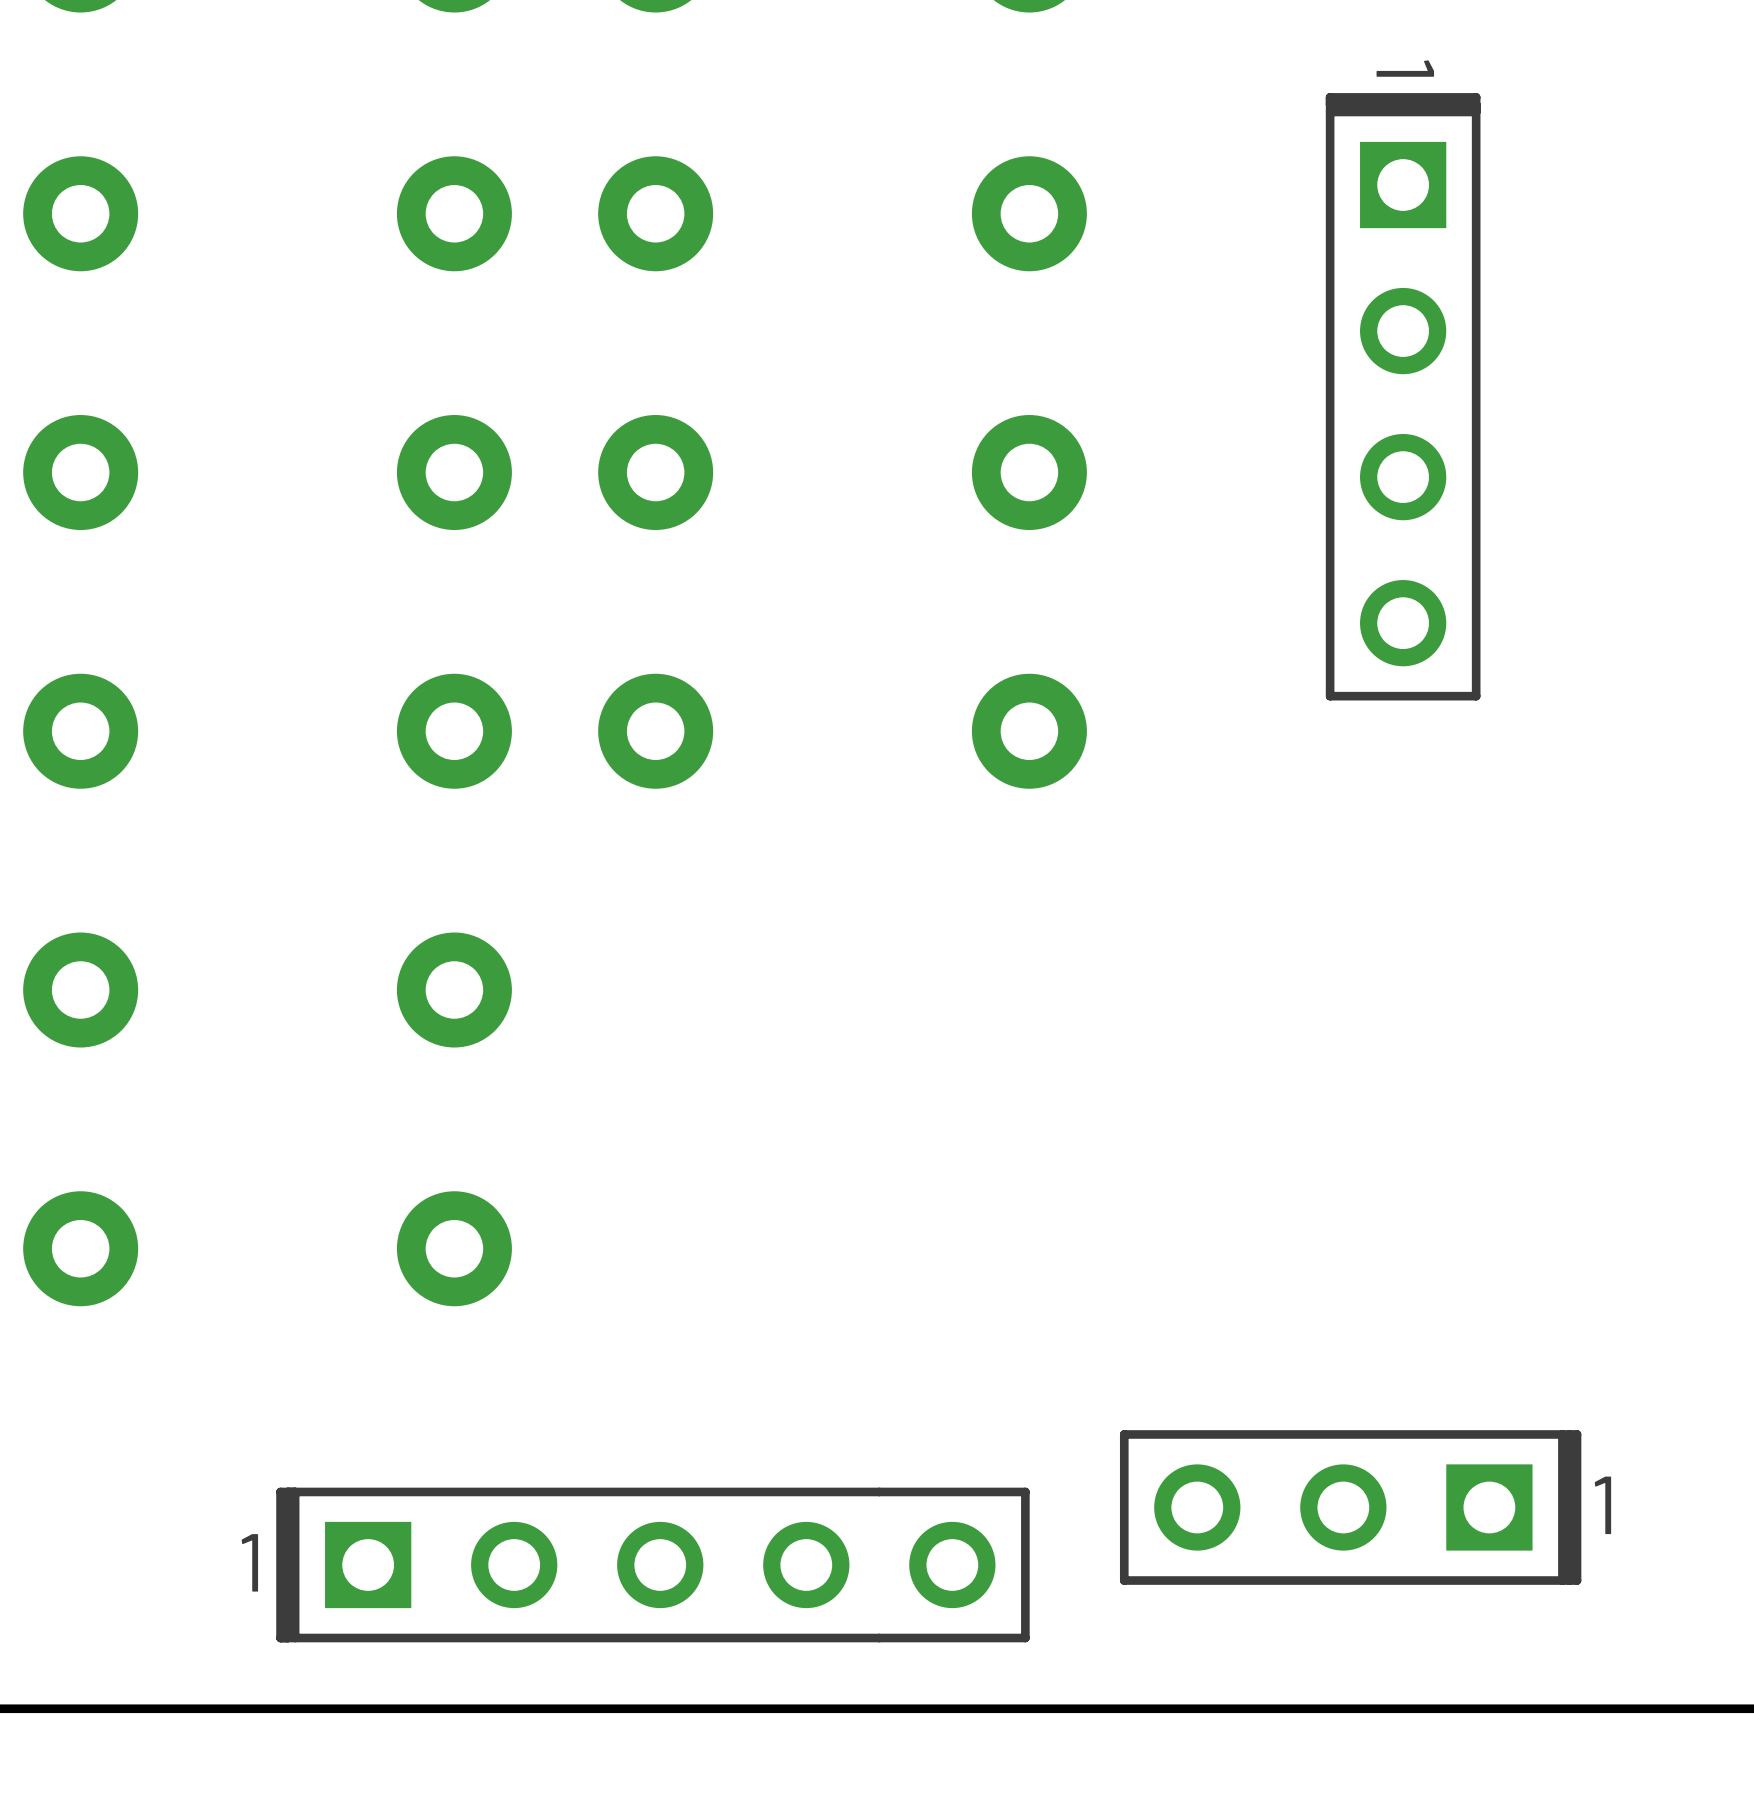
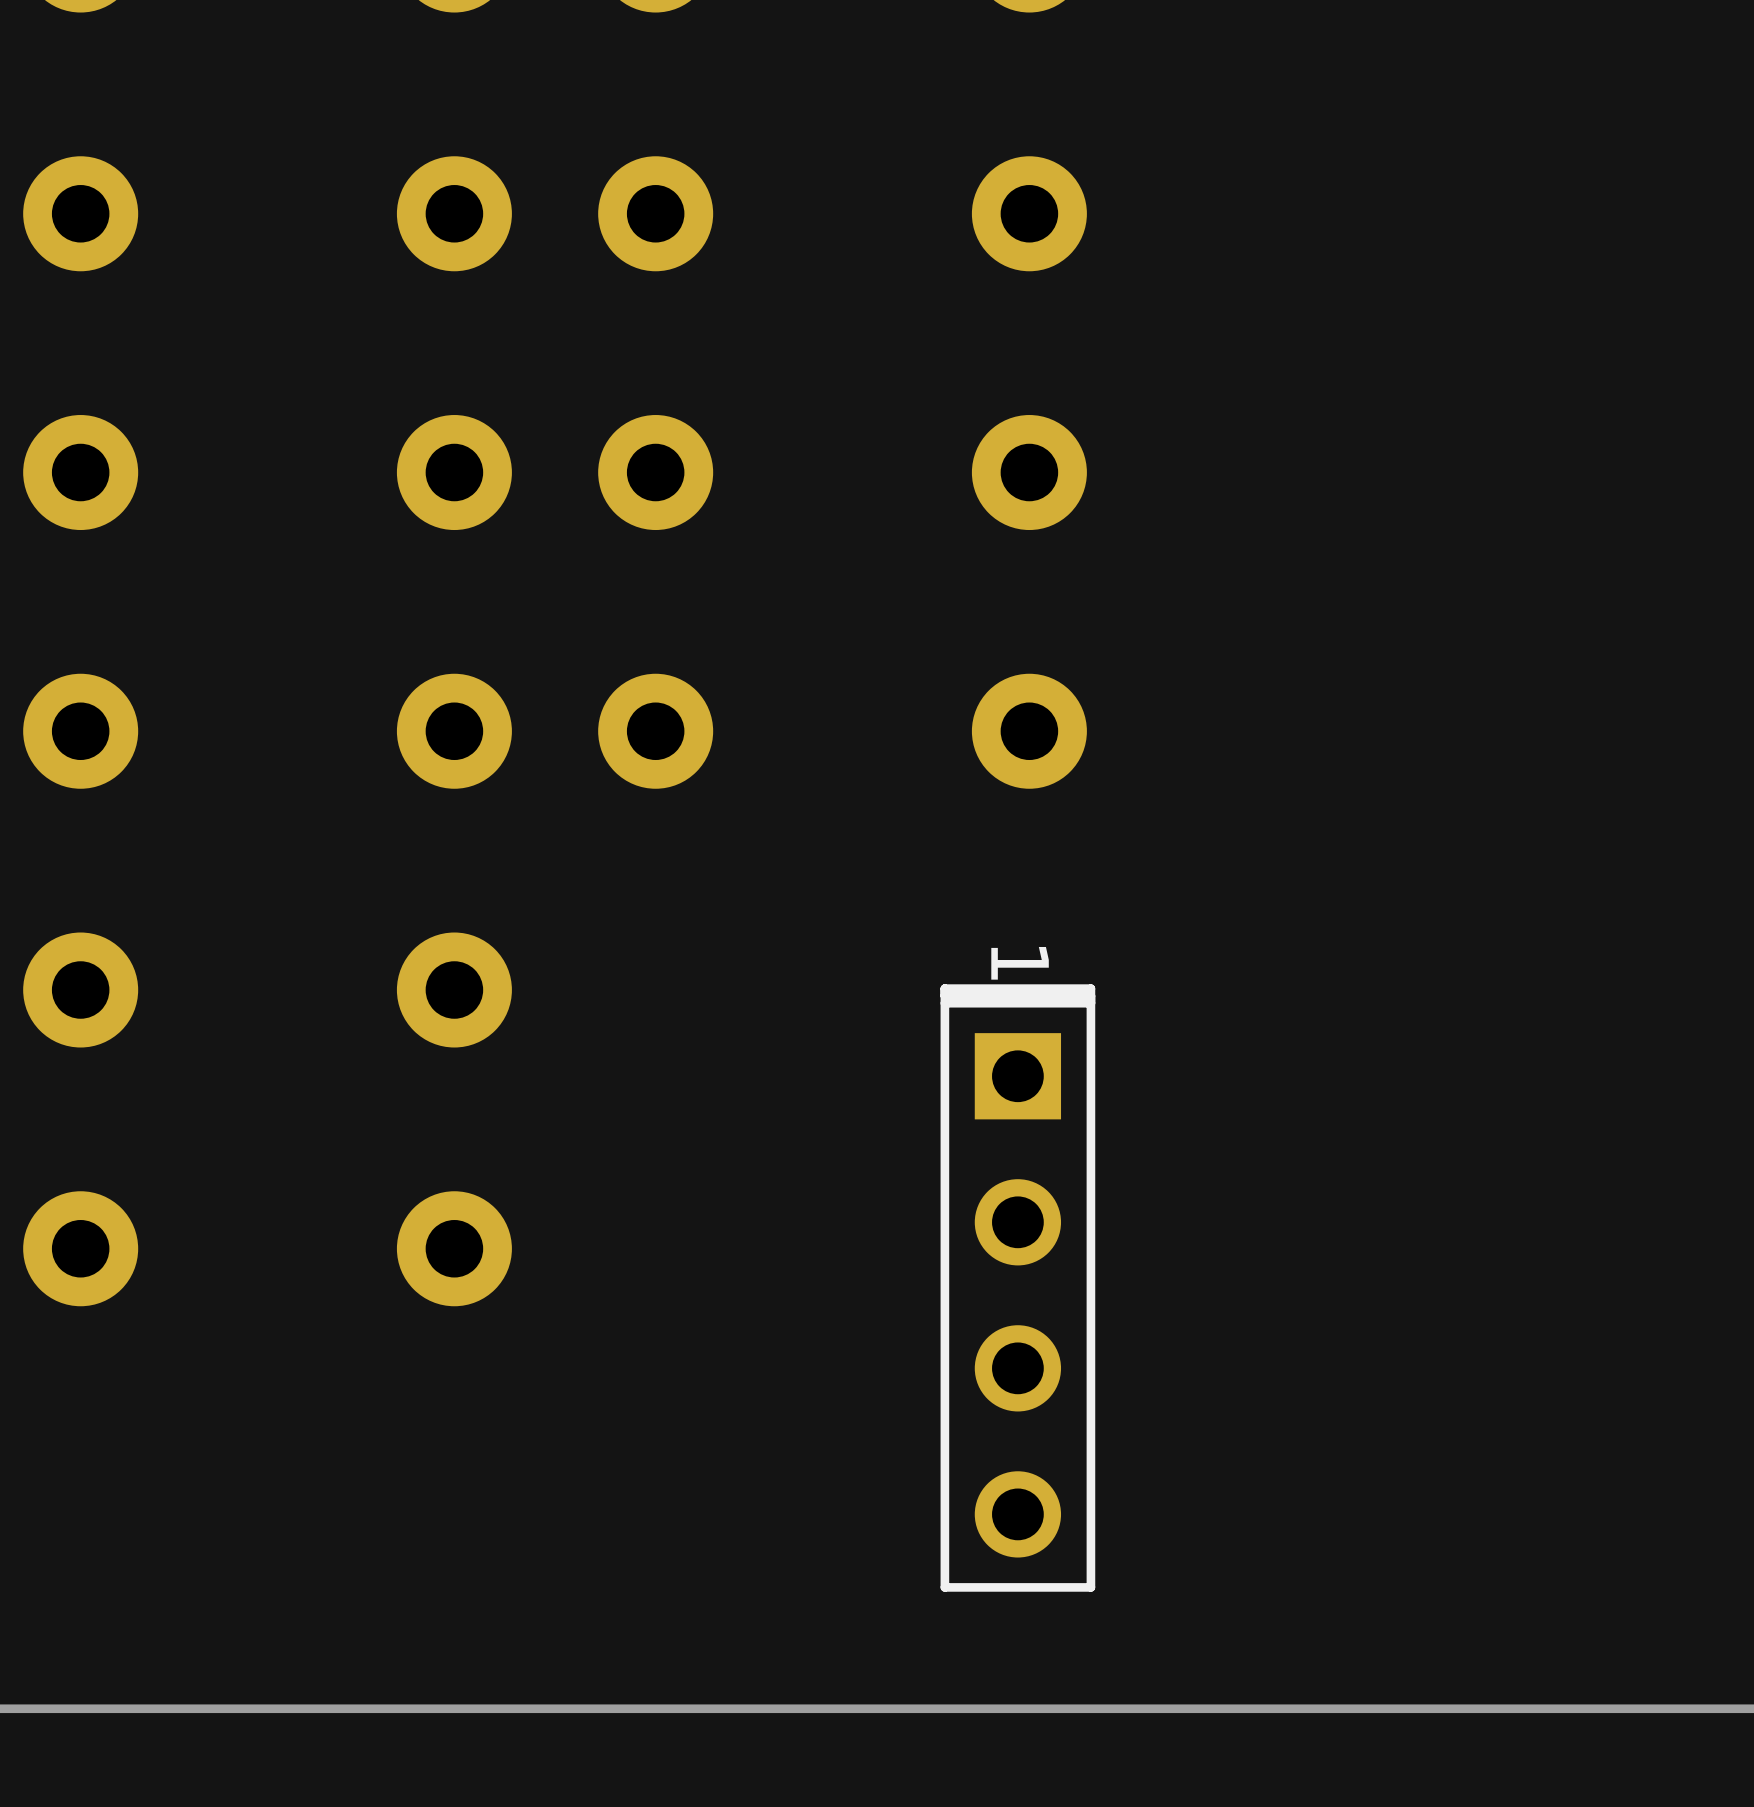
part position: (1403, 396) -> (1017, 1288)
part: (1350, 1507) -> none
part: (652, 1564) -> none

